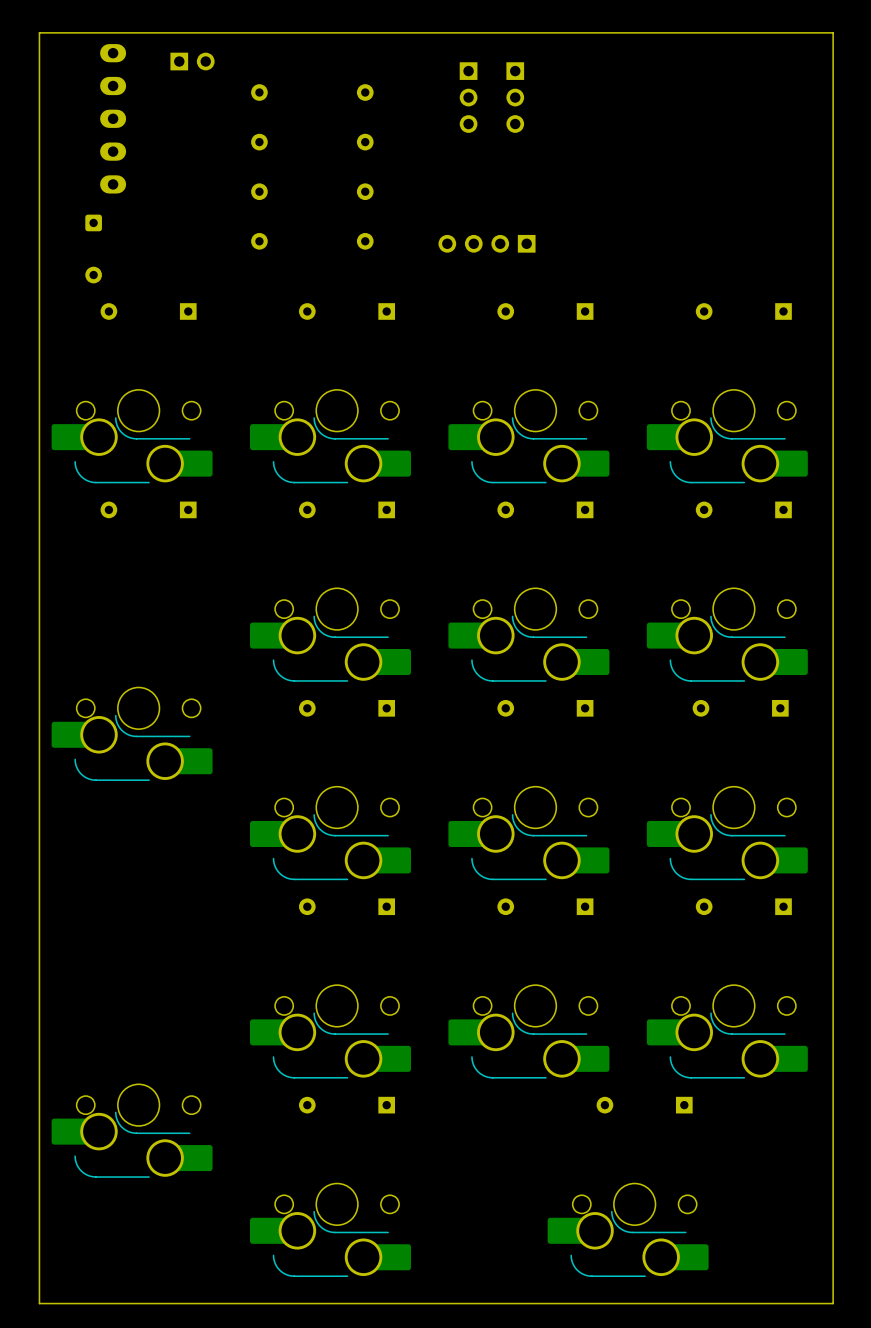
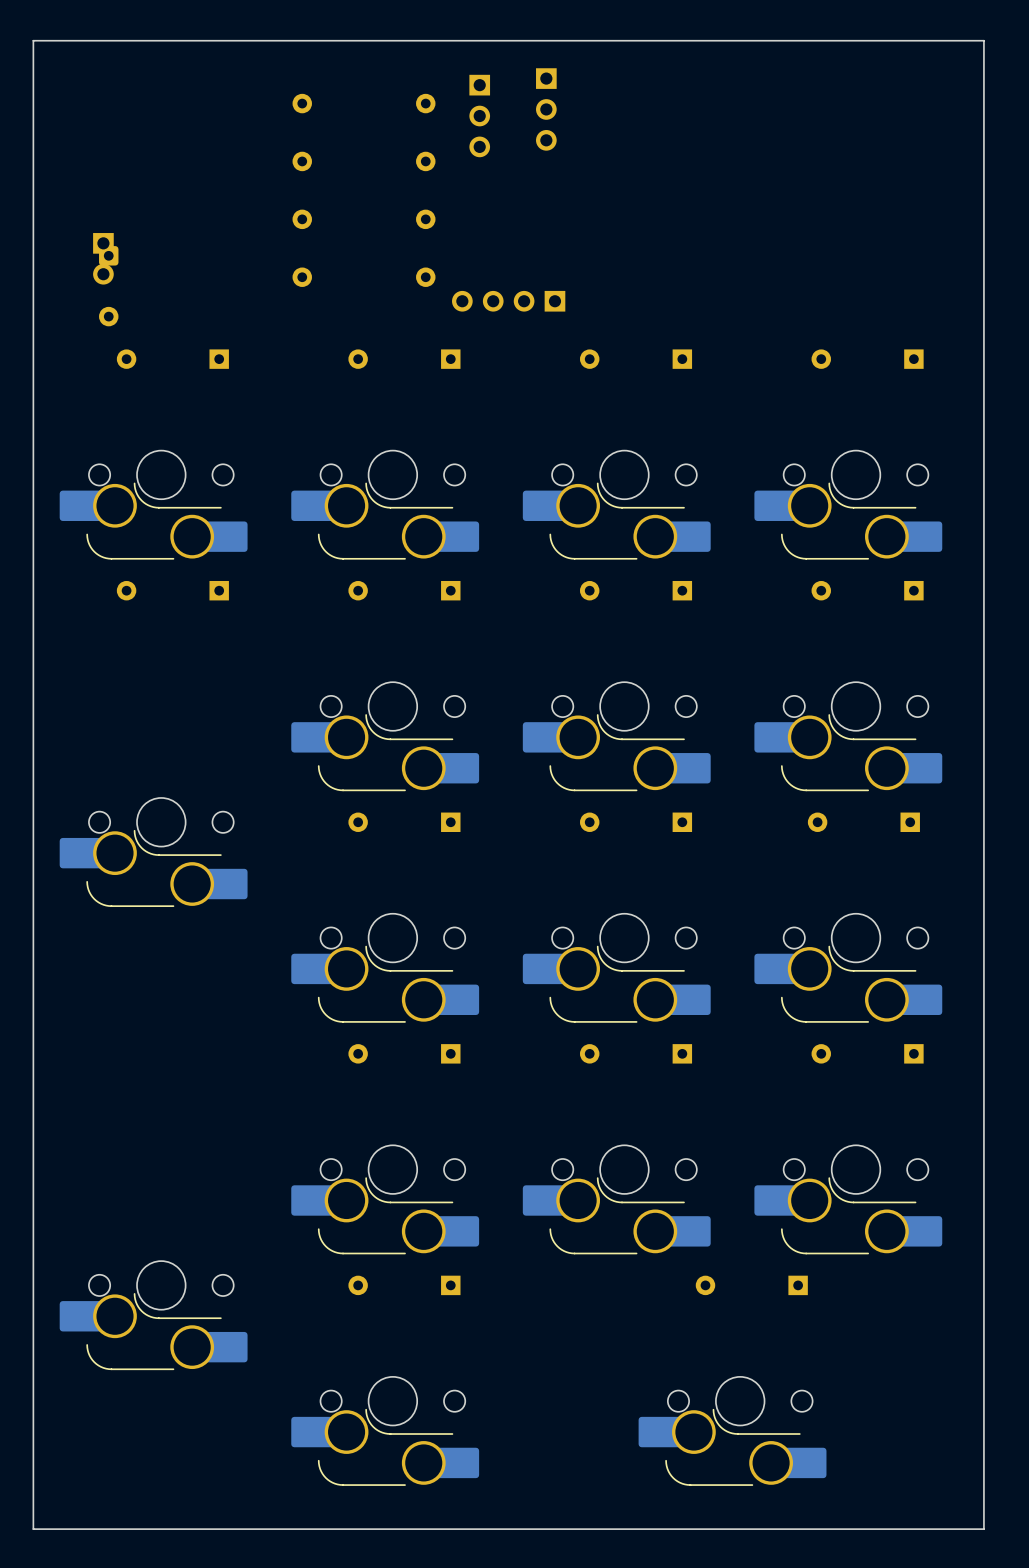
board edge: (833, 32) (39, 32) (39, 1303) (833, 1303) (833, 32) -> (983, 40) (983, 1529) (33, 1529) (33, 40) (983, 40)
part rotation: 0° (192, 61) -> 90° clockwise (103, 258)
part position: (192, 61) -> (103, 258)
part position: (515, 97) -> (479, 116)
part: (113, 118) -> none
part position: (487, 243) -> (508, 301)

